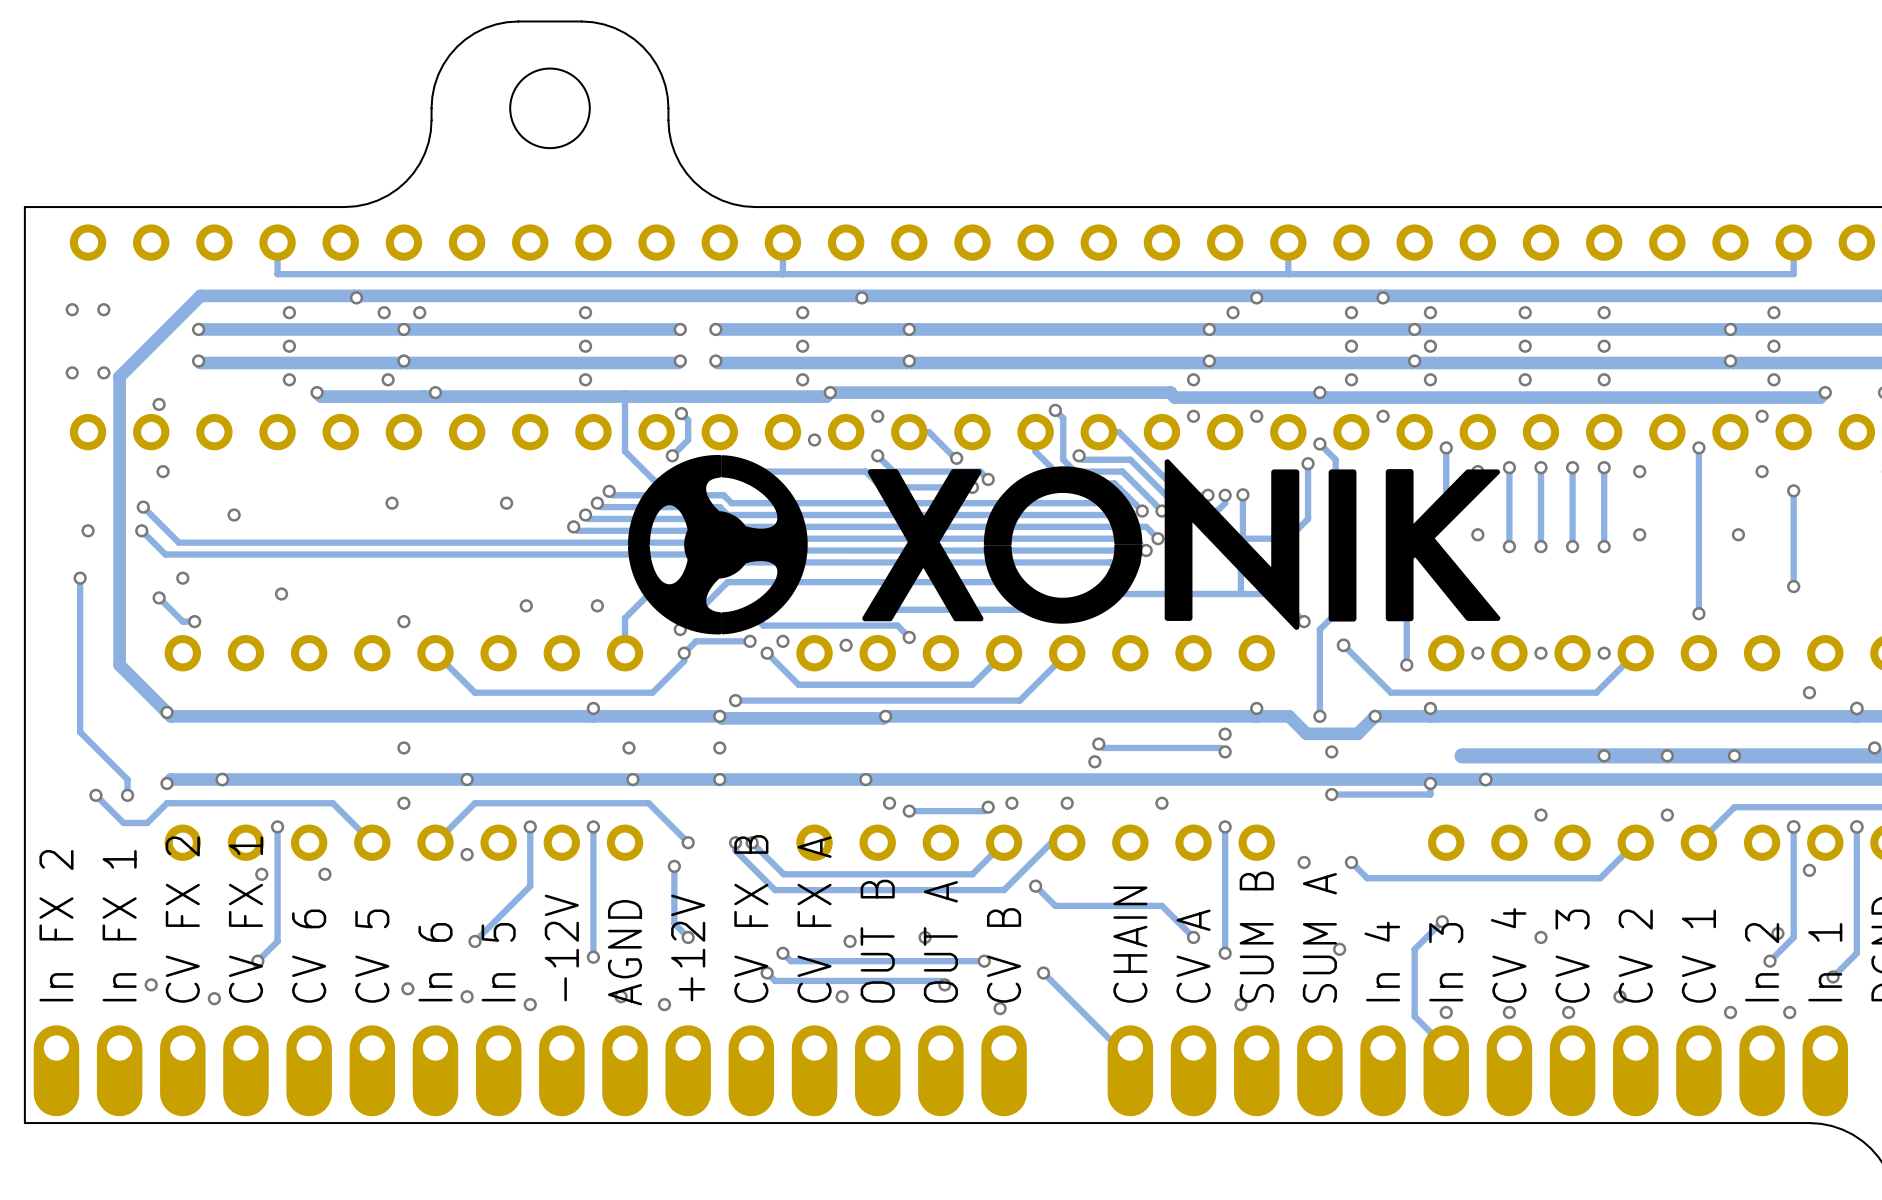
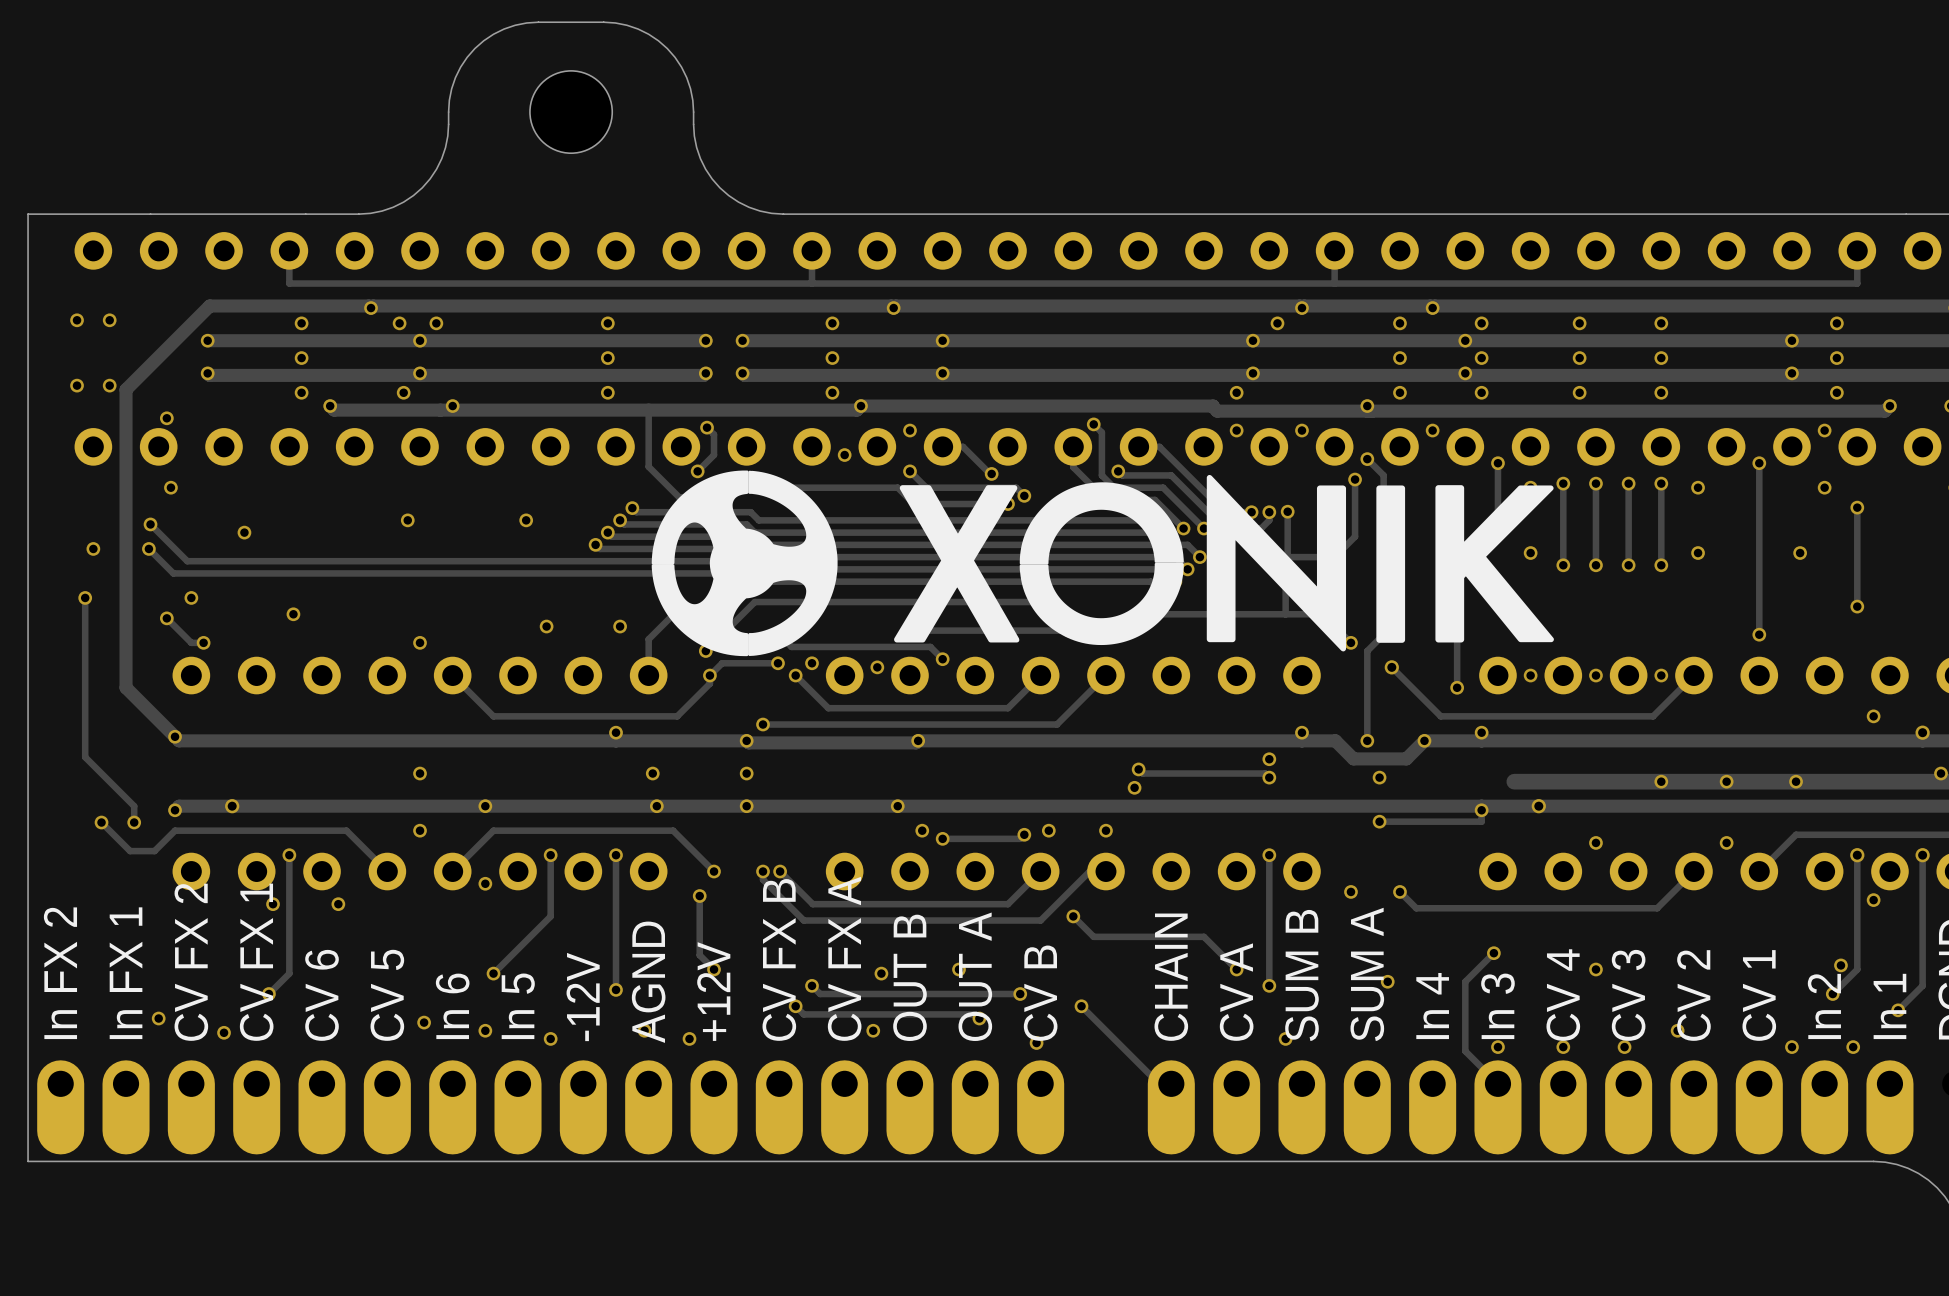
via: (1161, 803) -> none

